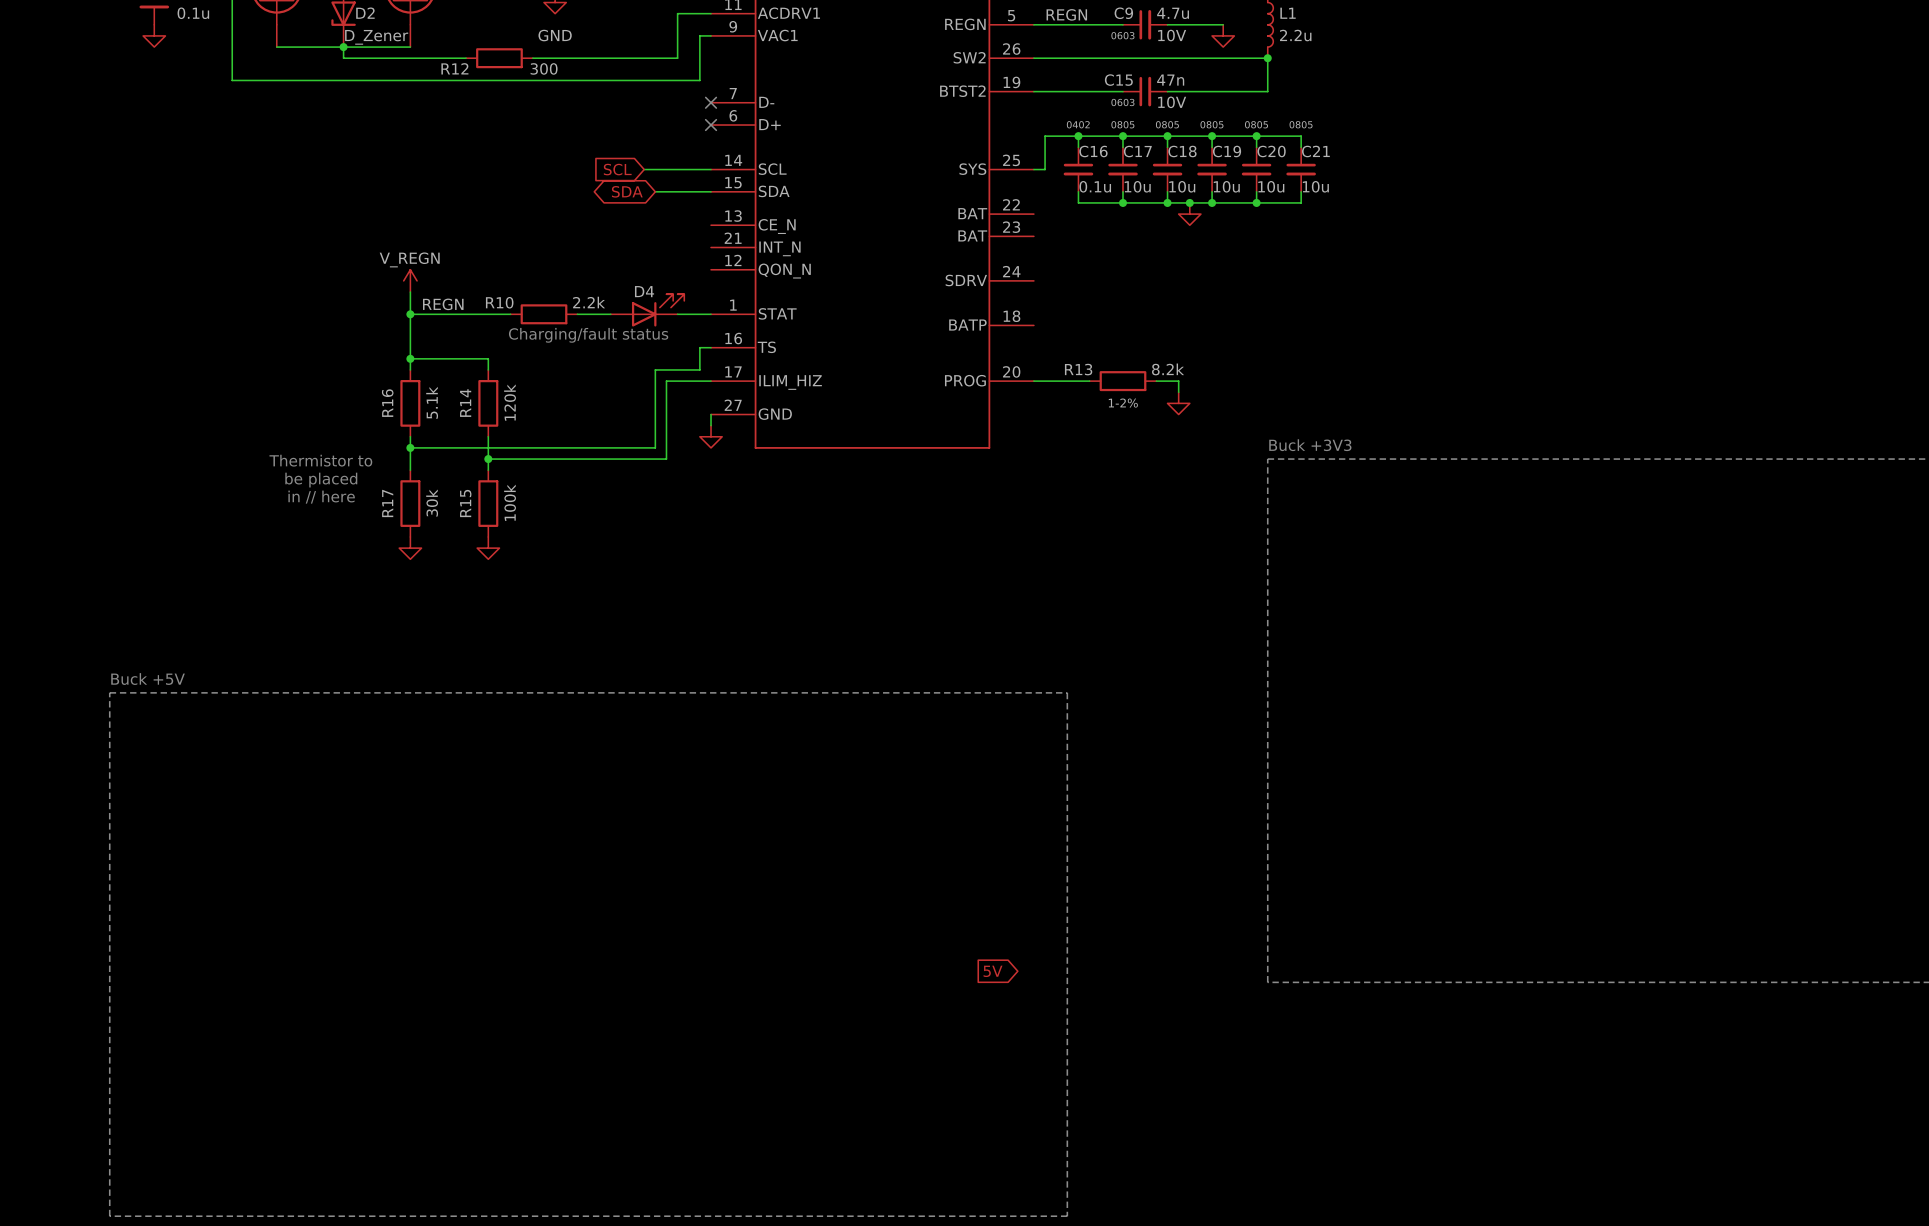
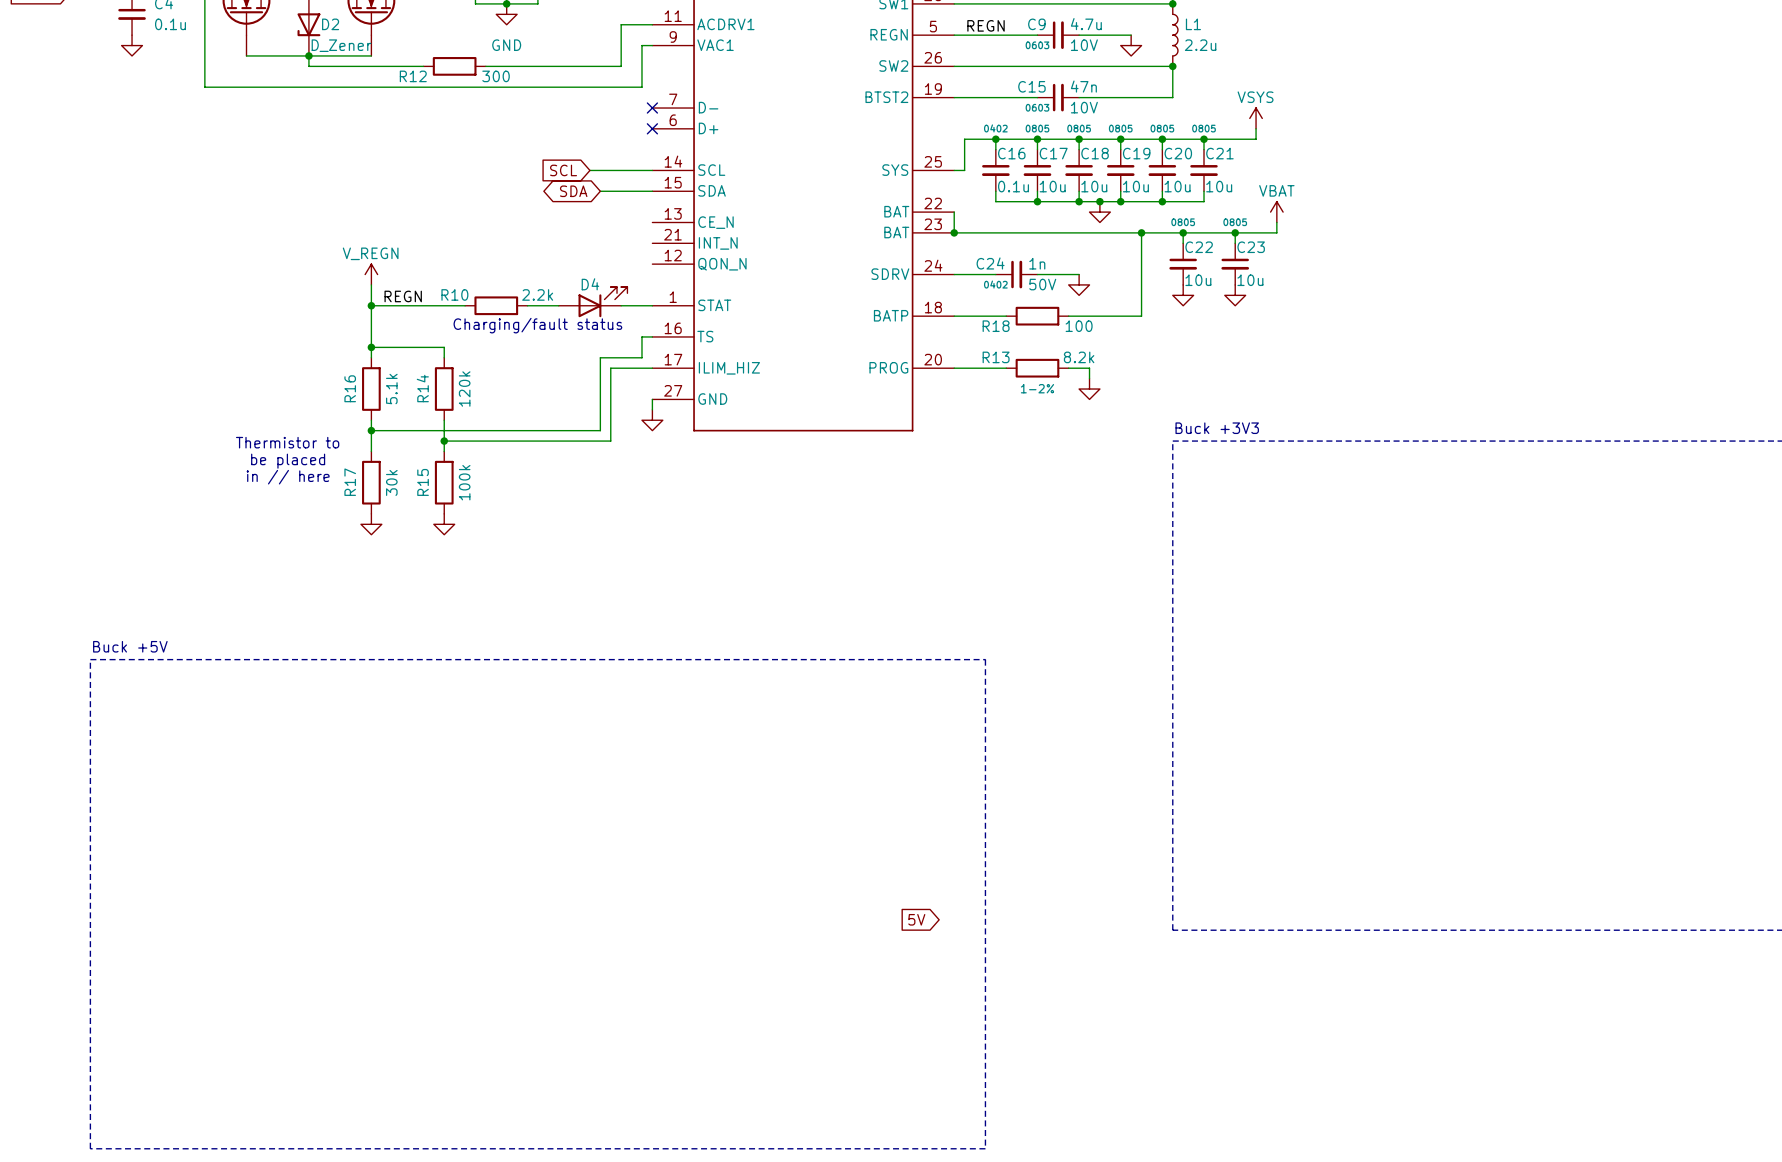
power symbol: none -> VSYS (1256, 118)
wire: none -> (1256, 128) (1256, 139) (1204, 139)
junction: none -> (1204, 139)
wire: none -> (954, 212) (954, 232) (1276, 232) (1276, 222)
power symbol: none -> VBAT (1276, 212)
junction: none -> (954, 232)
wire: none -> (1141, 232) (1141, 316) (1068, 316)
junction: none -> (1141, 232)
wire: none -> (1183, 232) (1183, 243)
junction: none -> (1183, 232)
wire: none -> (1235, 232) (1235, 243)
junction: none -> (1235, 232)
C22: none -> 10u (1183, 264)
C23: none -> 10u (1235, 264)
wire: none -> (954, 274) (995, 274)
C24: none -> 1n (1016, 274)
wire: none -> (1037, 274) (1079, 274)
power symbol: none -> (1079, 284)
power symbol: none -> (1183, 295)
power symbol: none -> (1235, 295)
wire: none -> (954, 316) (1006, 316)
R18: none -> 100 (1037, 316)

